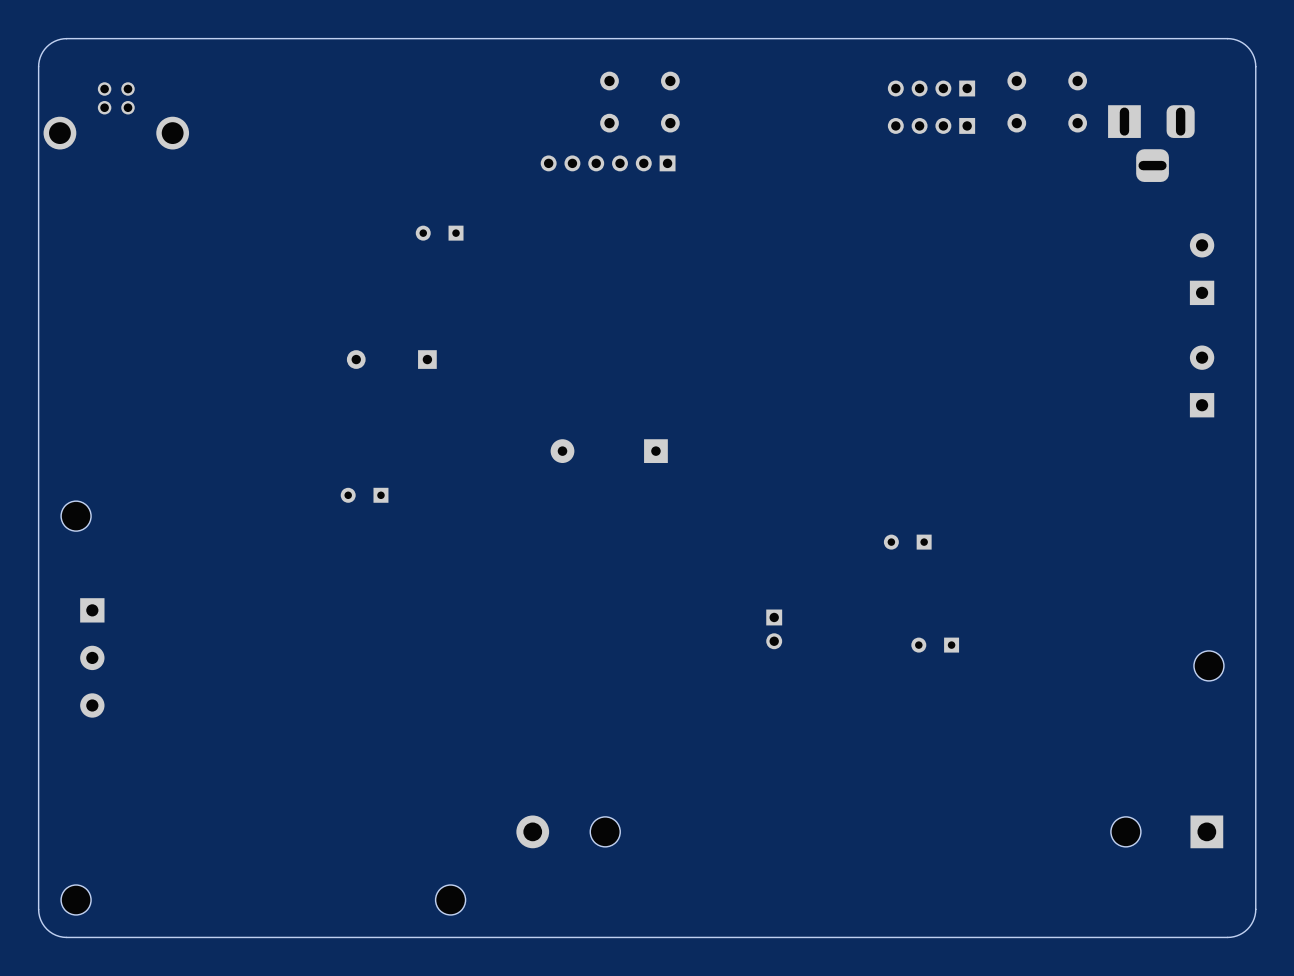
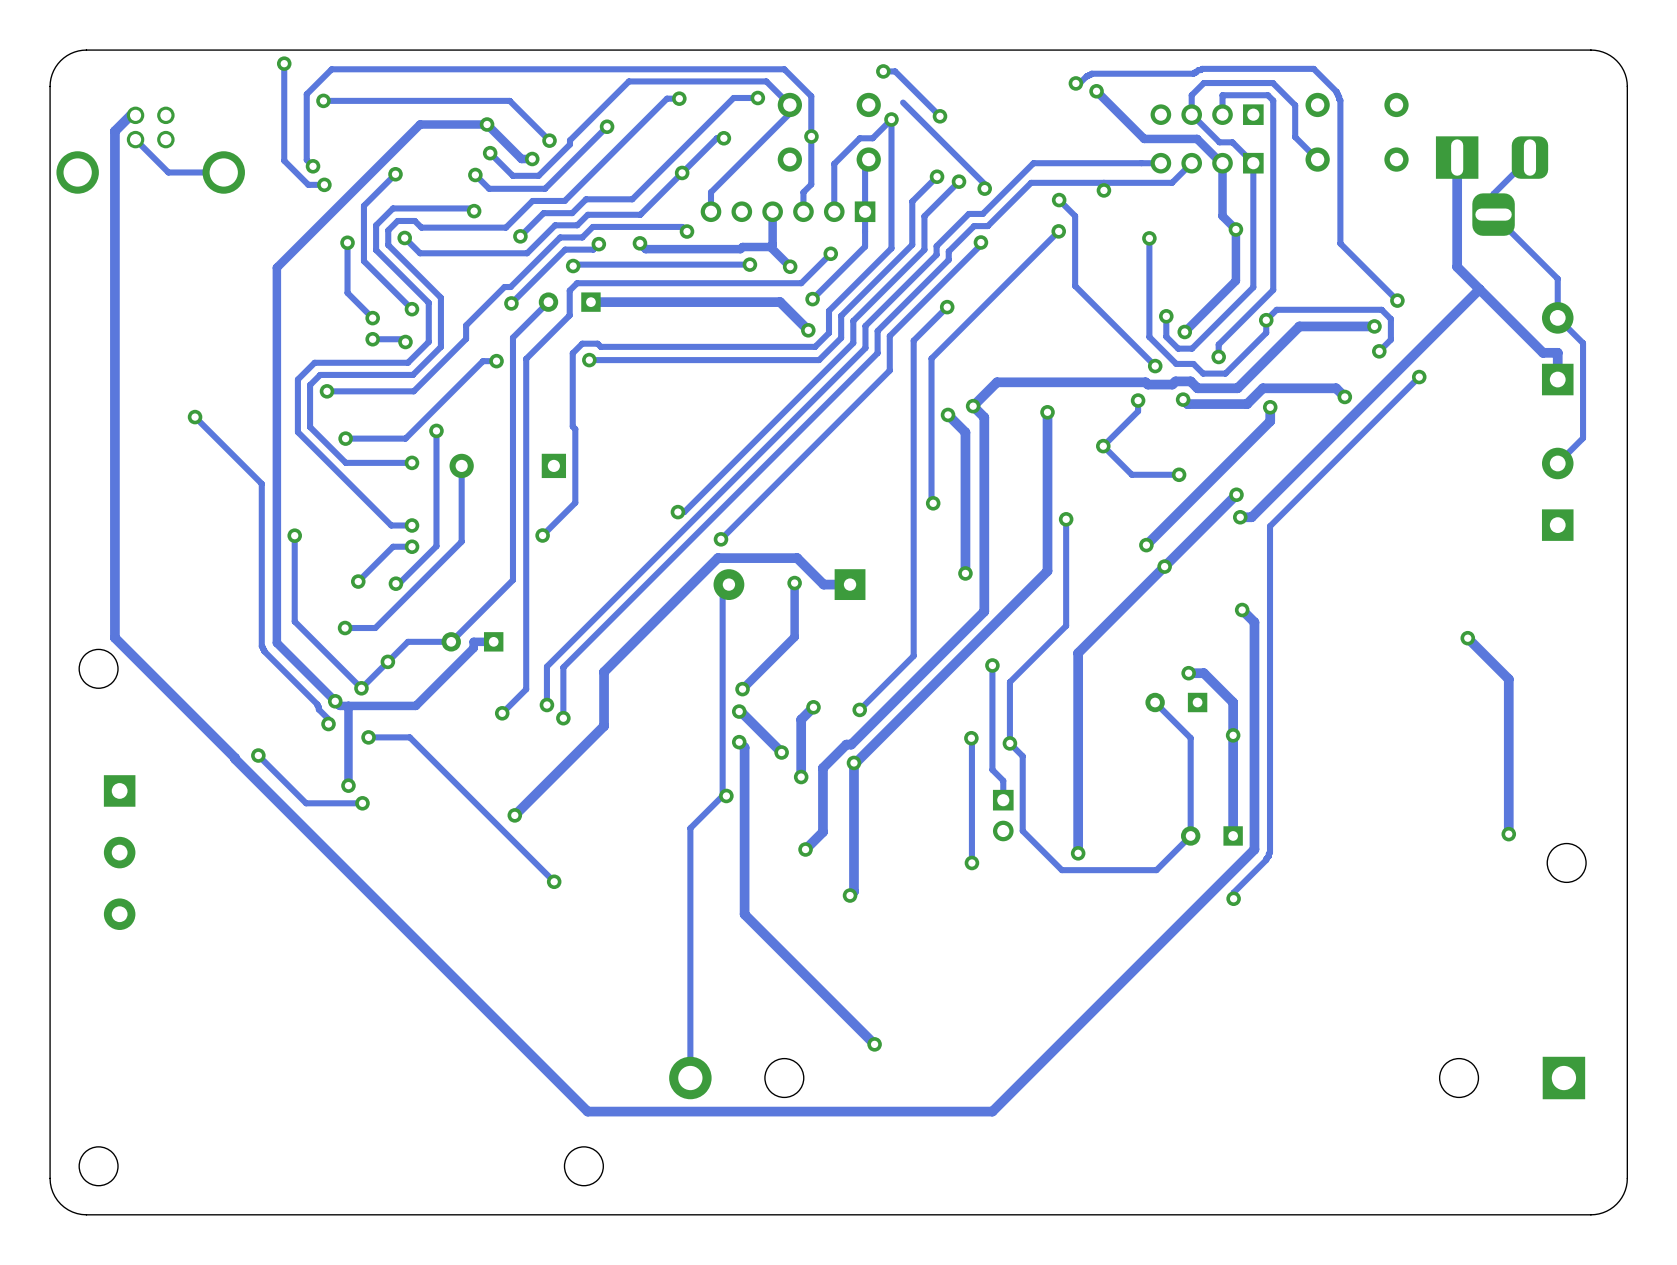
track: none -> (284, 63) (284, 160) (308, 184) (324, 184)
via: none -> (284, 63)
track: none -> (883, 71) (895, 71) (940, 116)
via: none -> (883, 71)
track: none -> (1075, 83) (1079, 83) (1091, 73) (1193, 73) (1202, 68) (1313, 68) (1336, 91) (1340, 100) (1340, 243) (1397, 300)
via: none -> (1075, 83)
track: none -> (1096, 91) (1144, 138) (1197, 138) (1222, 163) (1222, 216) (1235, 229) (1235, 280) (1184, 331)
via: none -> (1096, 91)
track: none -> (757, 97) (733, 97) (632, 199) (586, 199) (572, 213) (543, 213) (520, 236)
via: none -> (757, 97)
track: none -> (679, 98) (667, 98) (564, 200) (532, 200) (505, 227) (421, 227) (414, 220) (397, 220) (388, 230) (388, 245) (440, 297) (440, 346) (412, 374) (320, 374) (310, 385) (310, 427) (345, 462) (411, 462)
via: none -> (679, 98)
track: none -> (323, 100) (509, 100) (549, 140)
via: none -> (323, 100)
track: none -> (903, 102) (984, 184)
track: none -> (1191, 114) (1219, 142) (1232, 142) (1253, 163) (1253, 287) (1192, 348) (1178, 348) (1166, 336) (1166, 316)
track: none -> (1191, 114) (1191, 95) (1203, 83) (1272, 83) (1295, 105) (1295, 137) (1317, 159)
track: none -> (1222, 114) (1222, 95) (1267, 95) (1273, 100) (1273, 289) (1218, 344) (1218, 356)
track: none -> (135, 115) (130, 115) (114, 131) (114, 637) (587, 1111) (992, 1111) (1254, 849) (1254, 622) (1242, 610)
via: none -> (940, 116)
via: none -> (891, 119)
via: none -> (487, 124)
track: none -> (607, 126) (545, 188) (489, 188) (475, 174)
via: none -> (607, 126)
via: none -> (811, 136)
track: none -> (723, 138) (716, 138) (640, 214) (587, 214) (577, 225) (555, 225) (527, 253) (420, 253) (404, 237)
via: none -> (723, 138)
track: none -> (135, 139) (168, 172) (223, 172)
via: none -> (549, 140)
track: none -> (490, 153) (512, 175) (538, 175) (569, 144) (569, 140) (628, 81) (766, 81) (789, 104) (789, 113) (711, 192) (711, 211)
via: none -> (490, 153)
track: none -> (1457, 157) (1457, 266) (1543, 352) (1557, 352) (1557, 379)
track: none -> (1529, 157) (1493, 193) (1493, 214) (1557, 278) (1557, 317) (1583, 343) (1583, 438) (1557, 463)
track: none -> (532, 159) (521, 159) (487, 124) (420, 124) (276, 267) (276, 642) (339, 705) (415, 705) (473, 648) (473, 641) (493, 641)
via: none -> (532, 159)
track: none -> (868, 159) (865, 163) (865, 246) (812, 299)
track: none -> (1160, 163) (1033, 163) (982, 213) (968, 213) (936, 246) (936, 254) (865, 325) (865, 348) (546, 666) (546, 705)
track: none -> (1191, 163) (1172, 182) (1031, 182) (987, 226) (974, 226) (948, 251) (948, 259) (877, 331) (877, 353) (563, 667) (563, 718)
track: none -> (313, 166) (306, 160) (306, 94) (331, 69) (784, 69) (811, 96) (811, 184) (803, 192) (803, 211)
via: none -> (313, 166)
via: none -> (682, 172)
track: none -> (395, 174) (363, 205) (363, 261) (411, 309)
via: none -> (395, 174)
via: none -> (475, 174)
track: none -> (937, 176) (912, 201) (912, 244) (841, 315) (841, 338) (819, 360) (589, 360)
via: none -> (937, 176)
track: none -> (959, 181) (924, 216) (924, 249) (853, 320) (853, 343) (684, 512) (677, 512)
via: none -> (959, 181)
via: none -> (324, 184)
via: none -> (984, 188)
via: none -> (1103, 190)
track: none -> (1059, 200) (1075, 216) (1075, 285) (1155, 366)
via: none -> (1059, 200)
track: none -> (474, 211) (471, 208) (393, 208) (376, 225) (376, 250) (428, 302) (428, 341) (407, 362) (314, 362) (297, 379) (297, 432) (391, 525) (412, 525)
via: none -> (474, 211)
track: none -> (772, 211) (772, 244) (770, 247)
track: none -> (834, 211) (834, 163) (859, 138) (872, 138) (891, 119) (891, 248) (828, 310) (828, 332) (815, 346) (600, 346) (597, 343) (582, 343) (572, 353) (575, 502) (542, 535)
via: none -> (1235, 229)
track: none -> (687, 231) (682, 226) (592, 226) (582, 237) (560, 237) (510, 287) (504, 287) (466, 325) (466, 338) (413, 391) (327, 391)
via: none -> (687, 231)
track: none -> (1058, 231) (931, 358) (931, 501) (933, 503)
via: none -> (1058, 231)
via: none -> (520, 236)
via: none -> (404, 237)
track: none -> (1149, 238) (1149, 337) (1176, 363) (1193, 363) (1203, 373) (1225, 373) (1266, 332) (1266, 320) (1276, 309) (1381, 309) (1390, 319) (1390, 339) (1379, 351)
via: none -> (1149, 238)
track: none -> (347, 242) (347, 292) (372, 318)
via: none -> (347, 242)
track: none -> (639, 243) (645, 249) (740, 249) (742, 247) (770, 247)
via: none -> (639, 243)
track: none -> (980, 242) (980, 244) (889, 336) (889, 370) (720, 539)
via: none -> (980, 242)
track: none -> (598, 244) (593, 249) (565, 249) (511, 303)
via: none -> (598, 244)
track: none -> (770, 247) (790, 266)
track: none -> (830, 253) (801, 283) (577, 283) (569, 290) (569, 315) (526, 358) (526, 689) (502, 713)
via: none -> (830, 253)
track: none -> (749, 264) (573, 266)
via: none -> (749, 264)
via: none -> (573, 266)
via: none -> (790, 266)
track: none -> (1479, 289) (1251, 517) (1240, 517)
via: none -> (812, 299)
via: none -> (1397, 300)
track: none -> (548, 302) (512, 337) (512, 580) (451, 641) (407, 641) (361, 688) (294, 621) (294, 535)
track: none -> (590, 302) (780, 302) (808, 330)
via: none -> (511, 303)
track: none -> (947, 307) (913, 340) (913, 655) (859, 709)
via: none -> (947, 307)
via: none -> (411, 309)
via: none -> (1166, 316)
via: none -> (372, 318)
via: none -> (1266, 320)
track: none -> (1374, 326) (1299, 326) (1237, 388) (1197, 388) (1190, 381) (1175, 381) (1172, 384) (1147, 384) (1145, 382) (996, 382) (973, 406) (984, 417) (984, 611) (851, 744) (846, 744) (822, 768) (822, 832) (805, 849)
via: none -> (1374, 326)
via: none -> (808, 330)
via: none -> (1184, 331)
track: none -> (372, 339) (402, 339) (405, 341)
via: none -> (372, 339)
via: none -> (405, 341)
via: none -> (1379, 351)
via: none -> (1218, 356)
via: none -> (589, 360)
track: none -> (496, 361) (483, 361) (405, 438) (345, 438)
via: none -> (496, 361)
via: none -> (1155, 366)
track: none -> (1419, 377) (1270, 526) (1270, 852) (1266, 859) (1233, 892) (1233, 898)
via: none -> (1419, 377)
via: none -> (327, 391)
track: none -> (1344, 396) (1336, 388) (1262, 388) (1247, 404) (1187, 404) (1183, 399)
via: none -> (1344, 396)
via: none -> (1183, 399)
track: none -> (1138, 400) (1138, 411) (1103, 446) (1131, 474) (1179, 474)
via: none -> (1138, 400)
via: none -> (973, 406)
track: none -> (1270, 407) (1270, 421) (1146, 545)
via: none -> (1270, 407)
track: none -> (1047, 412) (1047, 571) (853, 762) (853, 891) (850, 895)
via: none -> (1047, 412)
track: none -> (948, 414) (965, 432) (965, 573)
via: none -> (948, 414)
track: none -> (195, 417) (261, 483) (261, 646) (264, 651) (317, 704) (318, 709) (328, 719) (328, 724)
via: none -> (195, 417)
track: none -> (436, 430) (436, 546) (399, 583) (395, 583)
via: none -> (436, 430)
via: none -> (345, 438)
via: none -> (1103, 446)
via: none -> (411, 462)
track: none -> (461, 465) (461, 541) (375, 628) (345, 628)
via: none -> (1179, 474)
track: none -> (1236, 494) (1078, 653) (1078, 853)
via: none -> (1236, 494)
via: none -> (933, 503)
via: none -> (677, 512)
via: none -> (1240, 517)
track: none -> (1066, 519) (1066, 625) (1009, 682) (1009, 743) (1022, 756) (1022, 830) (1061, 870) (1156, 870) (1190, 835) (1190, 738) (1155, 702)
via: none -> (1066, 519)
via: none -> (412, 525)
via: none -> (294, 535)
via: none -> (542, 535)
via: none -> (720, 539)
via: none -> (1146, 545)
track: none -> (412, 546) (393, 546) (358, 581)
via: none -> (412, 546)
via: none -> (1164, 566)
via: none -> (965, 573)
via: none -> (358, 581)
track: none -> (794, 583) (794, 637) (742, 689)
via: none -> (794, 583)
via: none -> (395, 583)
track: none -> (728, 584) (722, 590) (722, 795)
track: none -> (850, 584) (823, 584) (797, 558) (717, 558) (604, 671) (604, 726) (514, 815)
via: none -> (1242, 610)
via: none -> (345, 628)
track: none -> (1467, 638) (1508, 679) (1508, 834)
via: none -> (1467, 638)
via: none -> (387, 661)
track: none -> (992, 665) (992, 769) (1003, 780) (1003, 800)
via: none -> (992, 665)
track: none -> (1188, 673) (1203, 673) (1233, 702) (1233, 835)
via: none -> (1188, 673)
via: none -> (361, 688)
via: none -> (742, 689)
via: none -> (335, 701)
track: none -> (348, 705) (348, 785)
via: none -> (546, 705)
track: none -> (813, 707) (801, 719) (801, 777)
via: none -> (813, 707)
via: none -> (859, 709)
track: none -> (739, 711) (781, 752)
via: none -> (739, 711)
via: none -> (502, 713)
via: none -> (563, 718)
via: none -> (328, 724)
via: none -> (1233, 735)
track: none -> (368, 737) (409, 737) (554, 881)
via: none -> (368, 737)
track: none -> (971, 738) (971, 863)
via: none -> (971, 738)
track: none -> (739, 742) (744, 747) (744, 914) (874, 1044)
via: none -> (739, 742)
via: none -> (1009, 743)
via: none -> (781, 752)
track: none -> (258, 755) (306, 803) (362, 803)
via: none -> (258, 755)
via: none -> (853, 762)
via: none -> (801, 777)
via: none -> (348, 785)
track: none -> (722, 795) (690, 828) (690, 1078)
via: none -> (726, 795)
via: none -> (362, 803)
via: none -> (514, 815)
via: none -> (1508, 834)
via: none -> (805, 849)
via: none -> (1078, 853)
via: none -> (971, 863)
via: none -> (554, 881)
via: none -> (850, 895)
via: none -> (1233, 898)
via: none -> (874, 1044)

